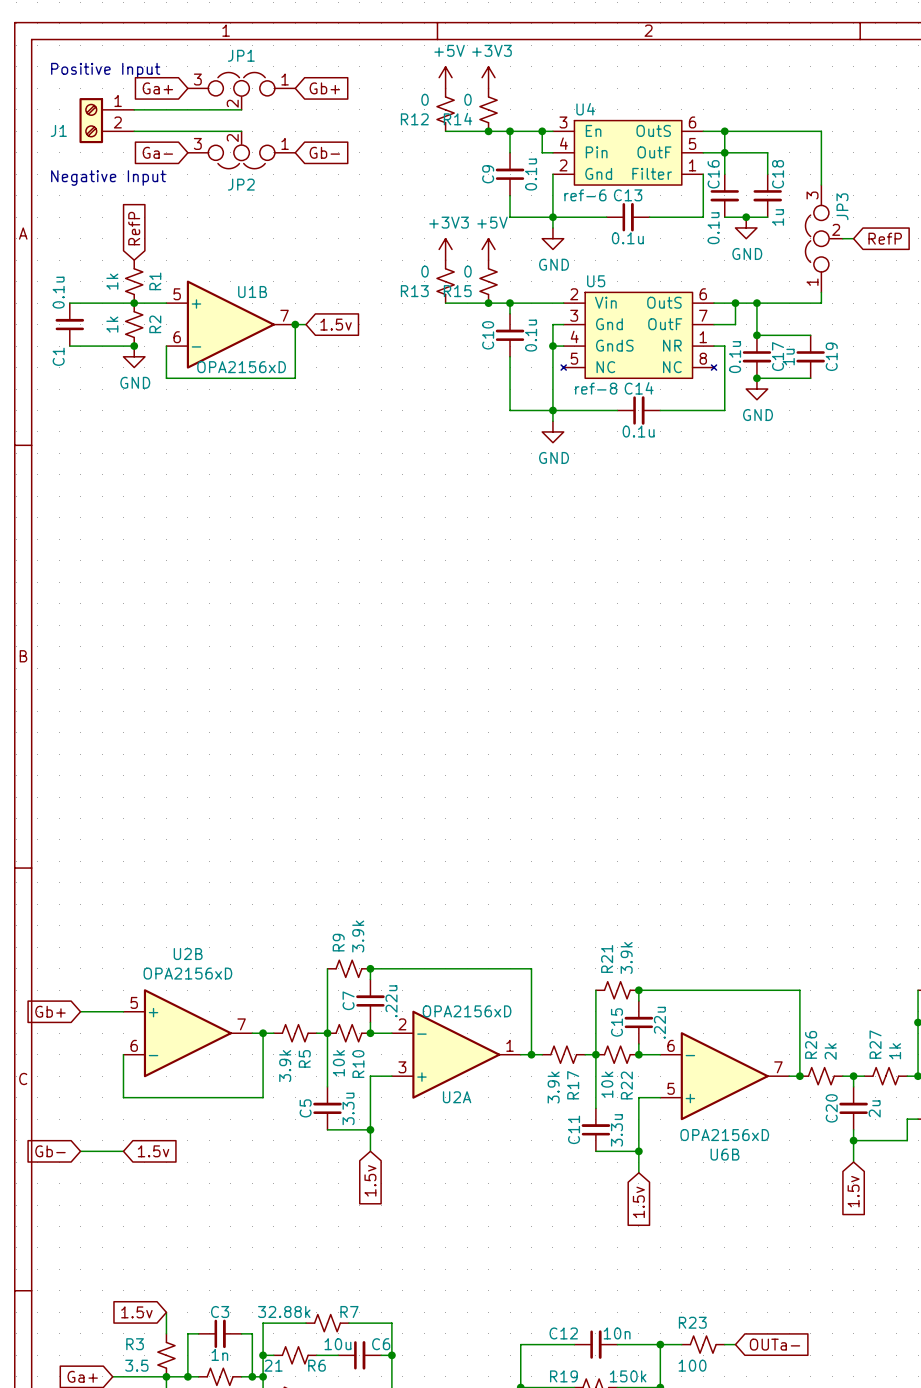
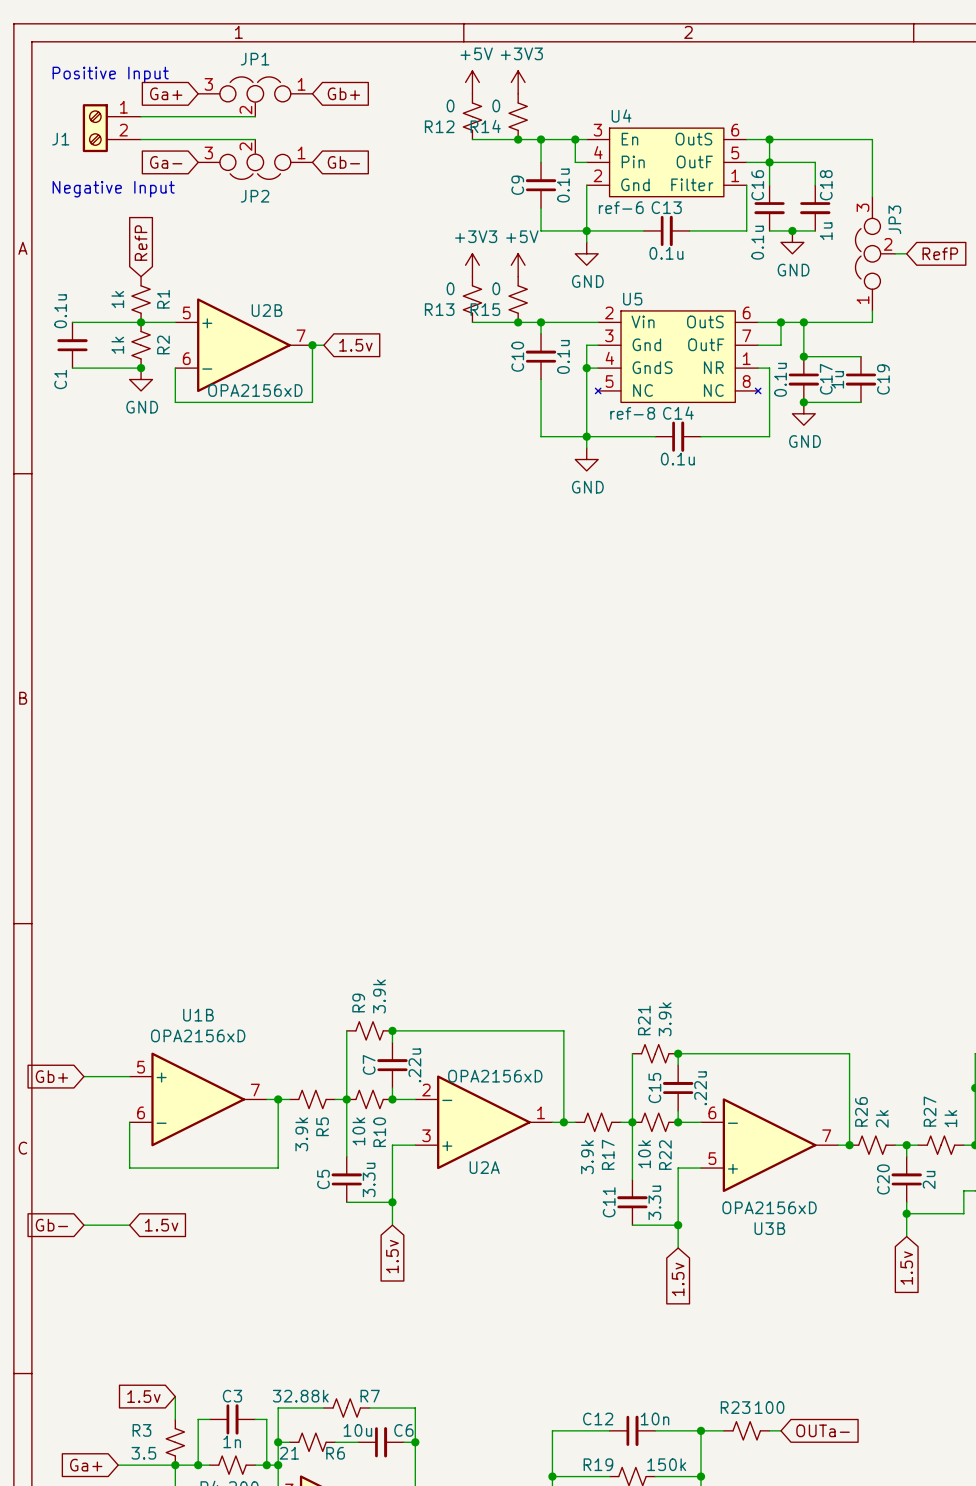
U1B name: U1B (252, 291) -> U2B (267, 310)
U2B name: U2B (188, 954) -> U1B (198, 1015)
U6B name: U6B (725, 1154) -> U3B (769, 1228)
R23 value position: 100 (692, 1365) -> 100 (769, 1407)

